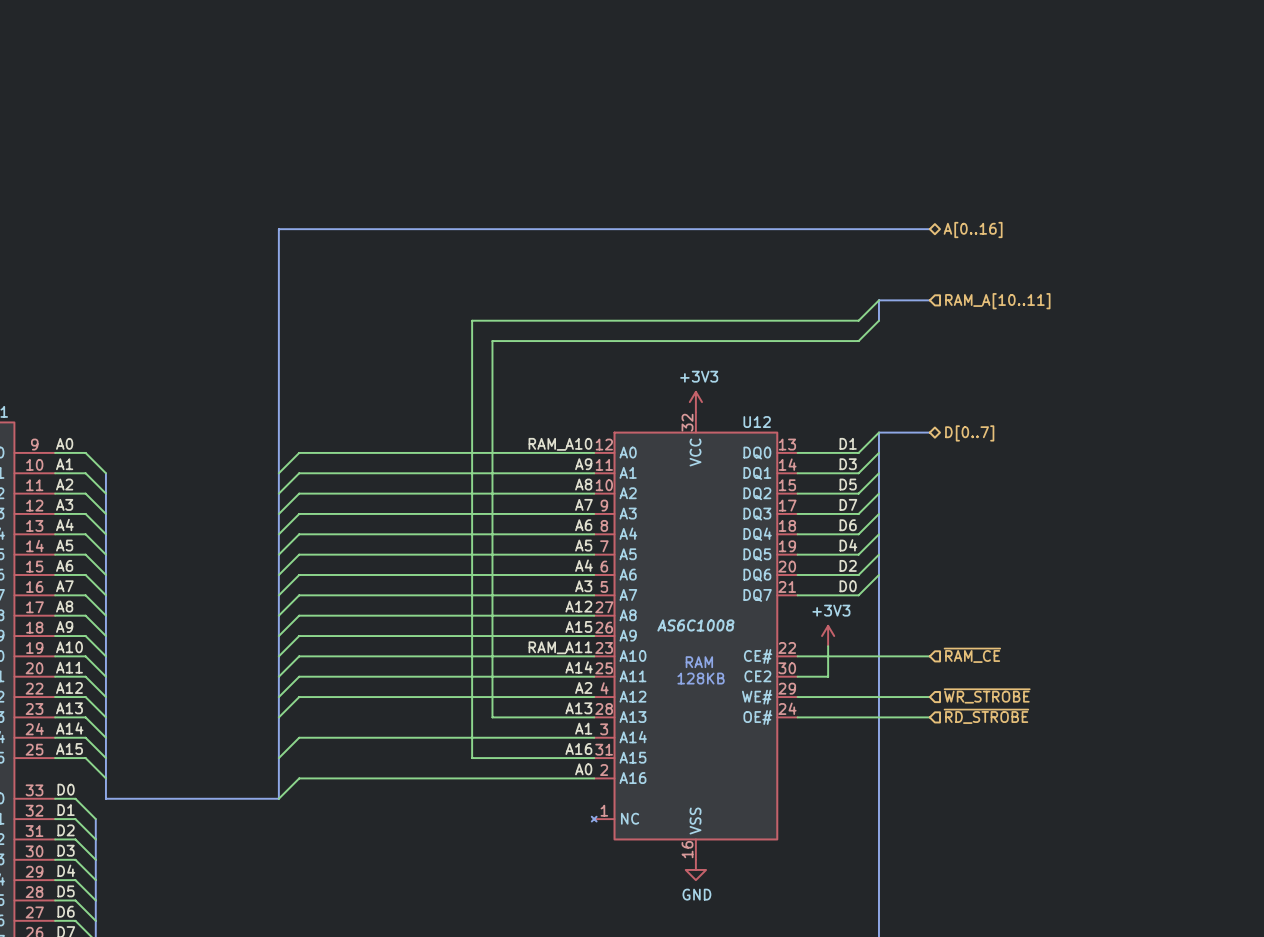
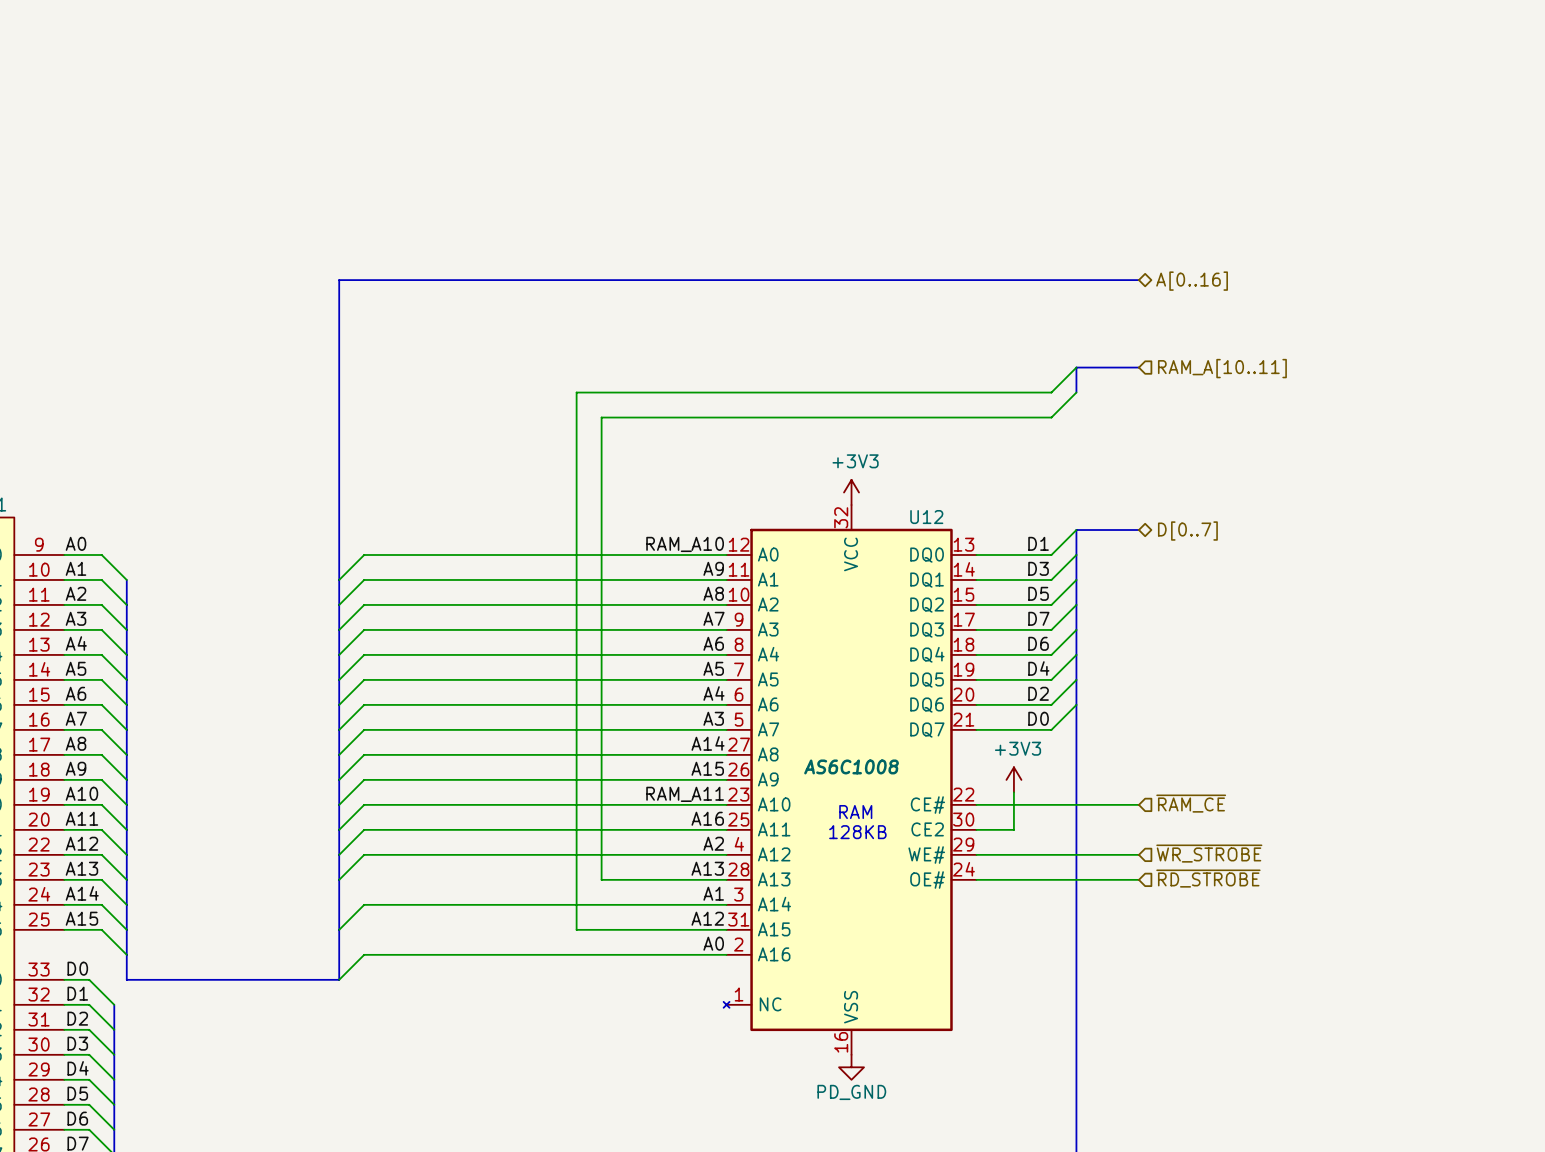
label: A12 (578, 606) -> A14 (708, 743)
label: A14 (579, 667) -> A16 (707, 818)
label: A16 (578, 749) -> A12 (707, 918)
power symbol: GND (695, 869) -> PD_GND (851, 1067)

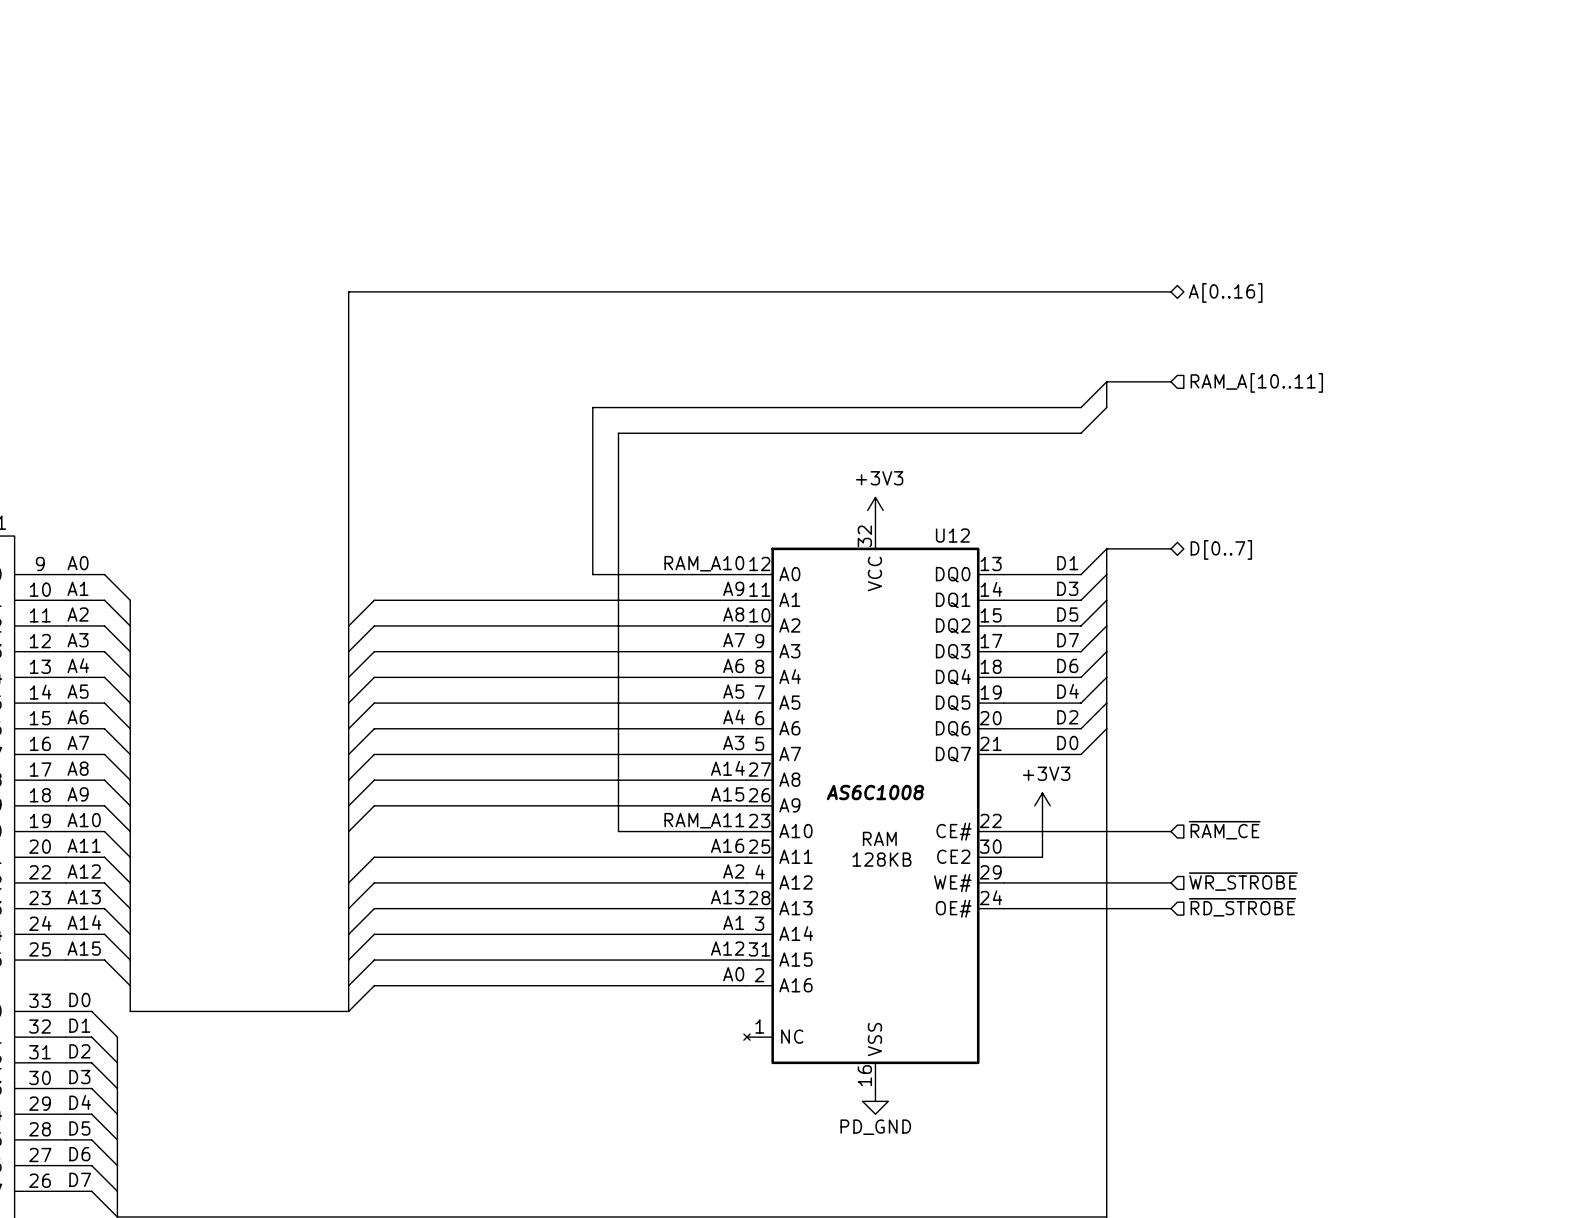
wire: (339, 579) (364, 554) (576, 554) (576, 929) -> (348, 985) (374, 960) (592, 960)
wire: (339, 829) (364, 804) (601, 804) (601, 879) -> (348, 934) (374, 908) (618, 908)

